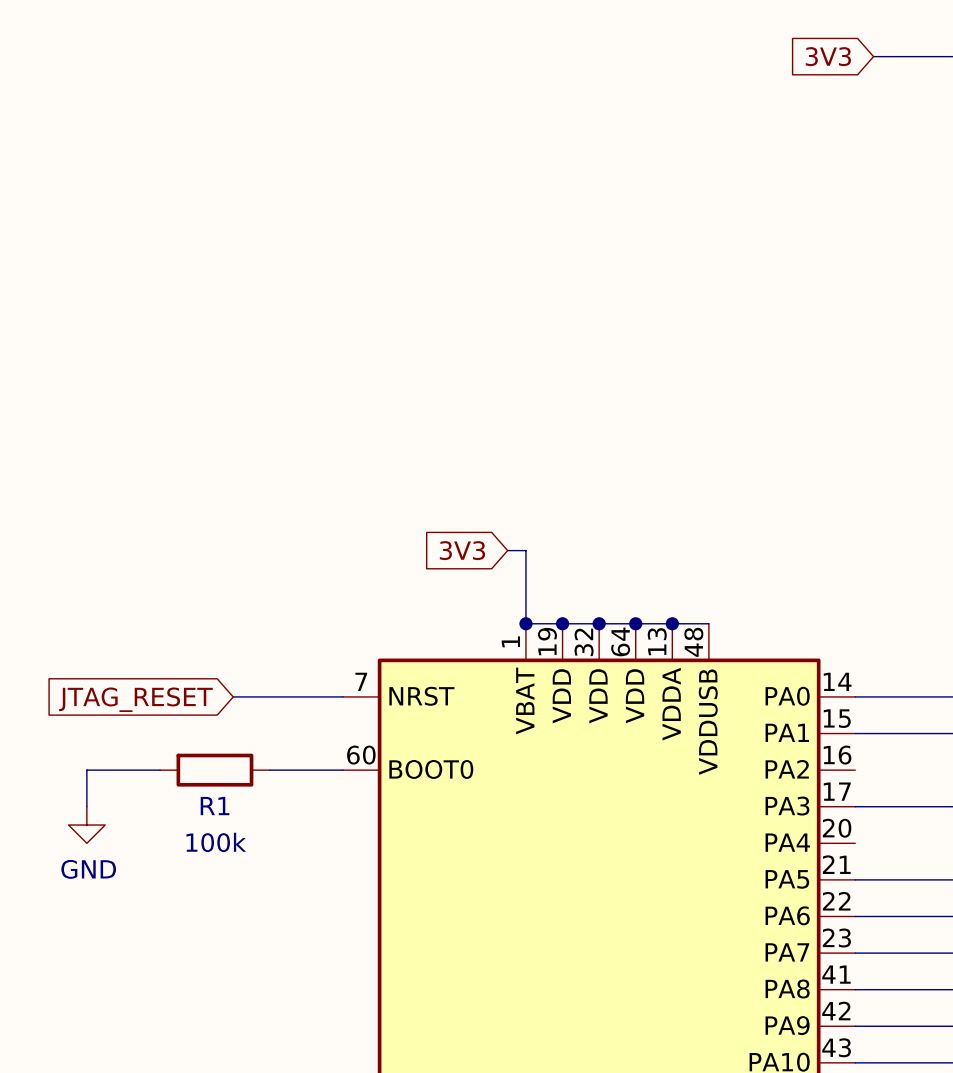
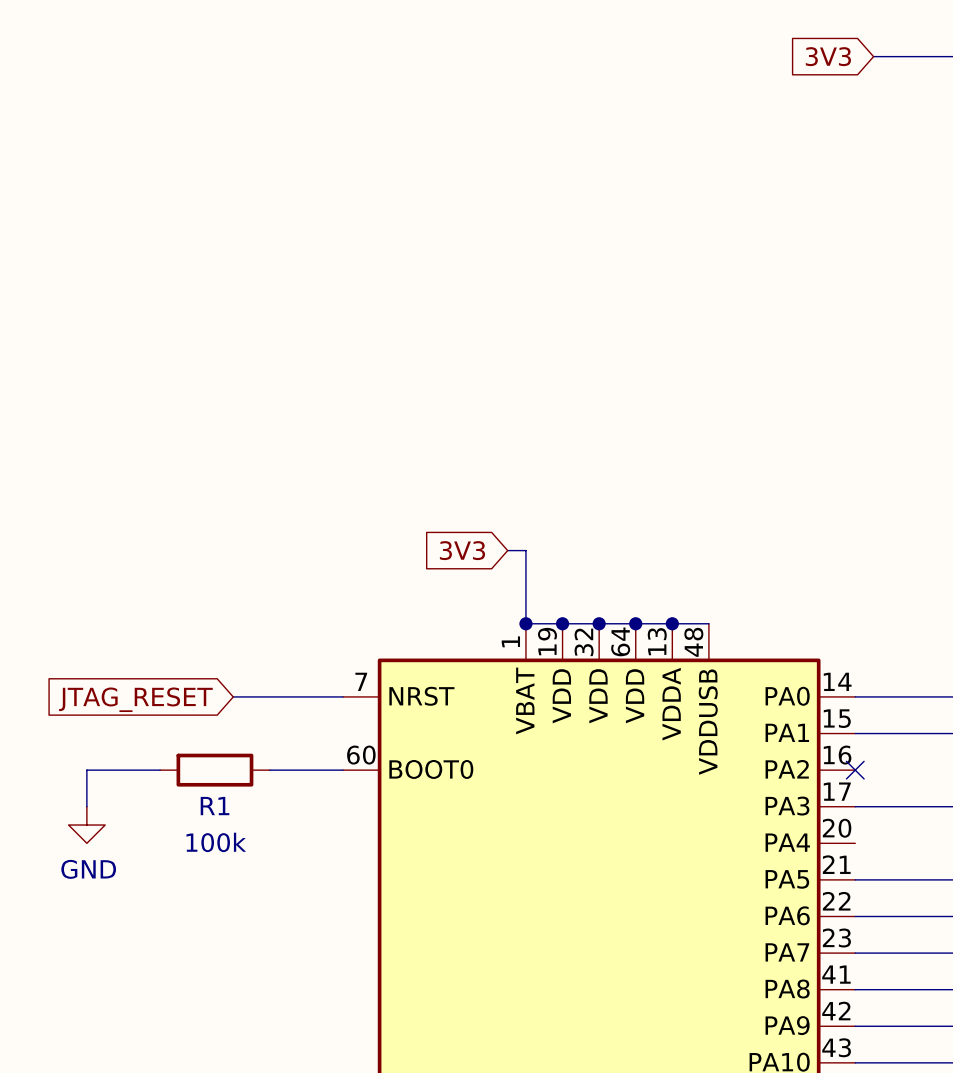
no-connect mark: none -> (855, 770)

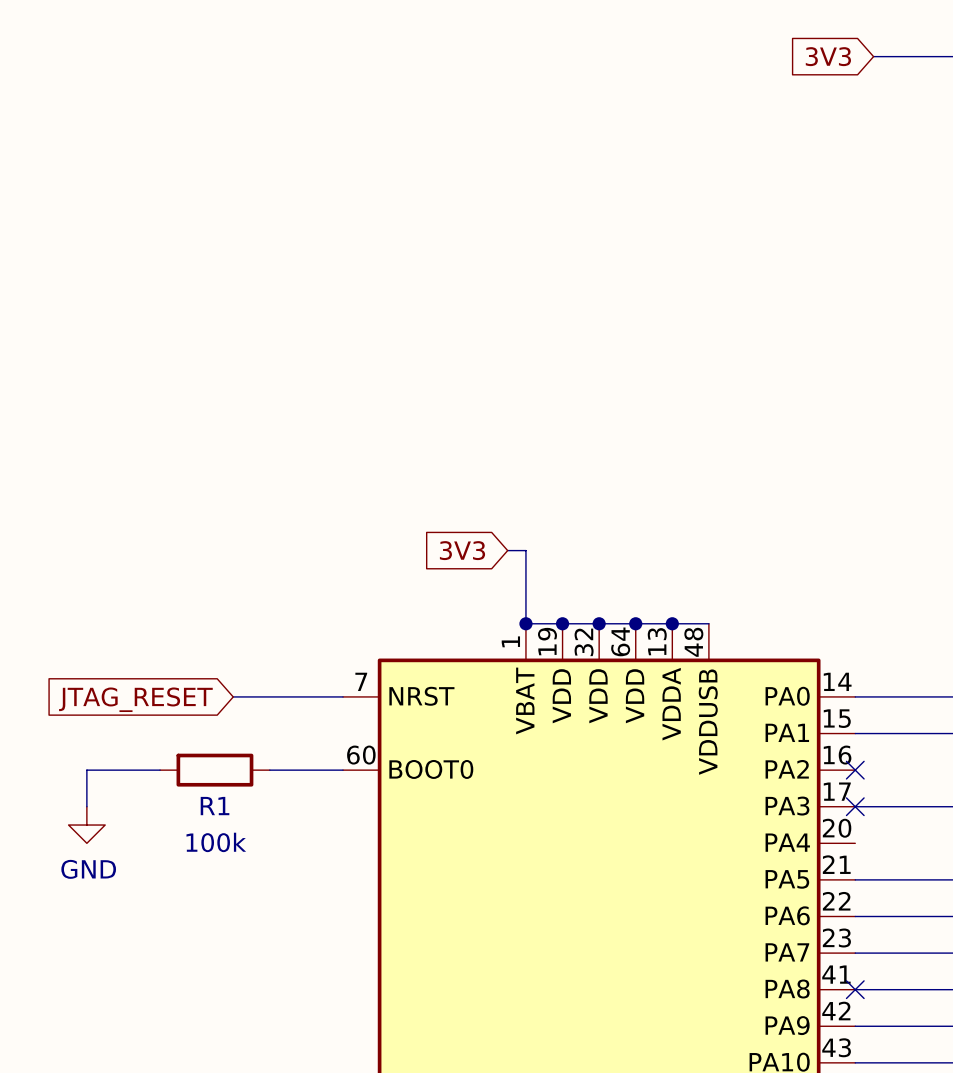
no-connect mark: none -> (855, 806)
no-connect mark: none -> (855, 989)

